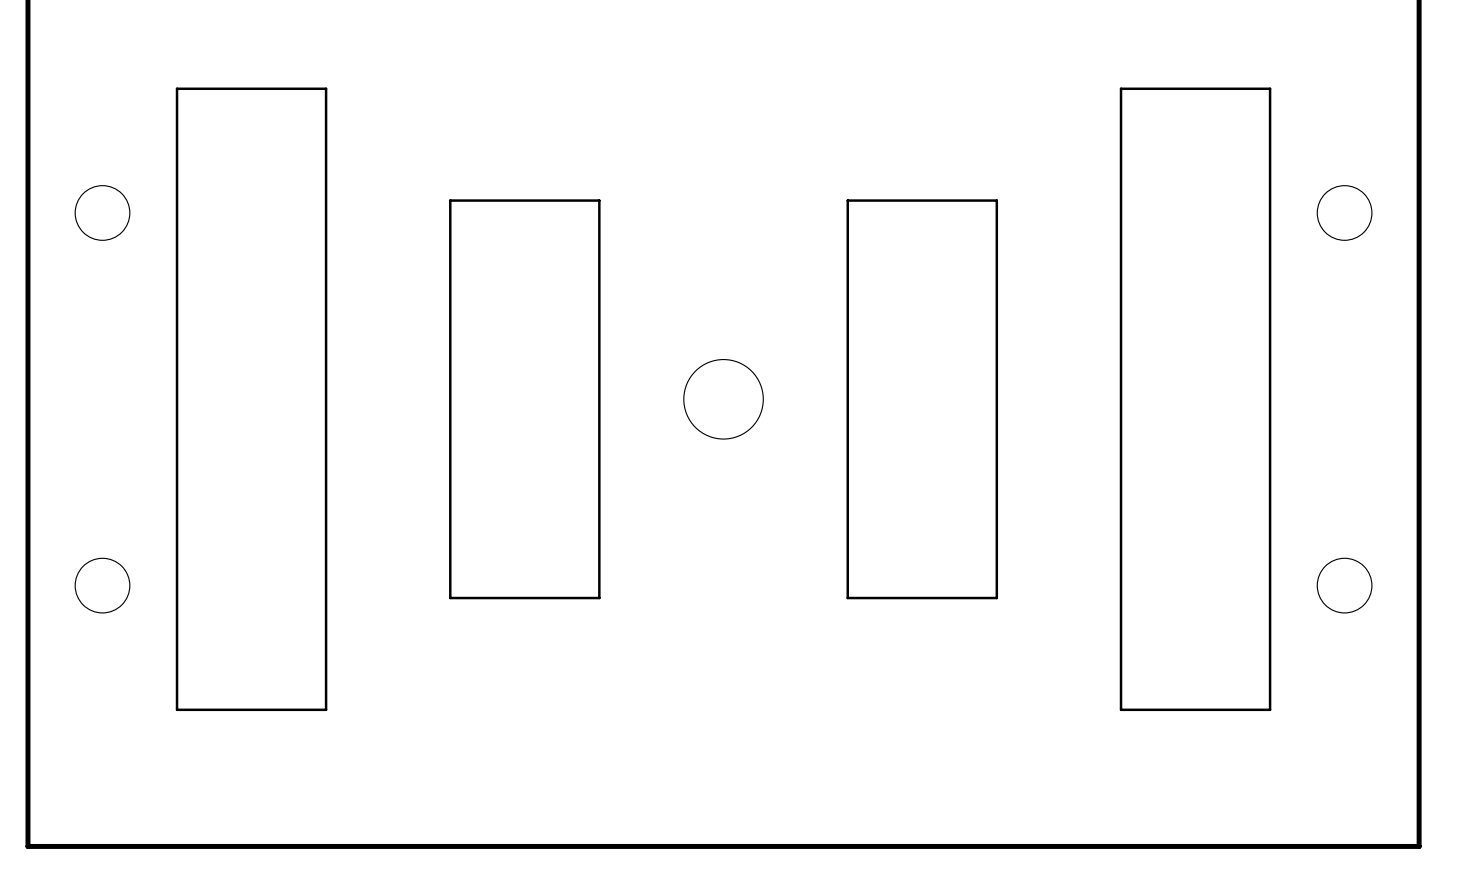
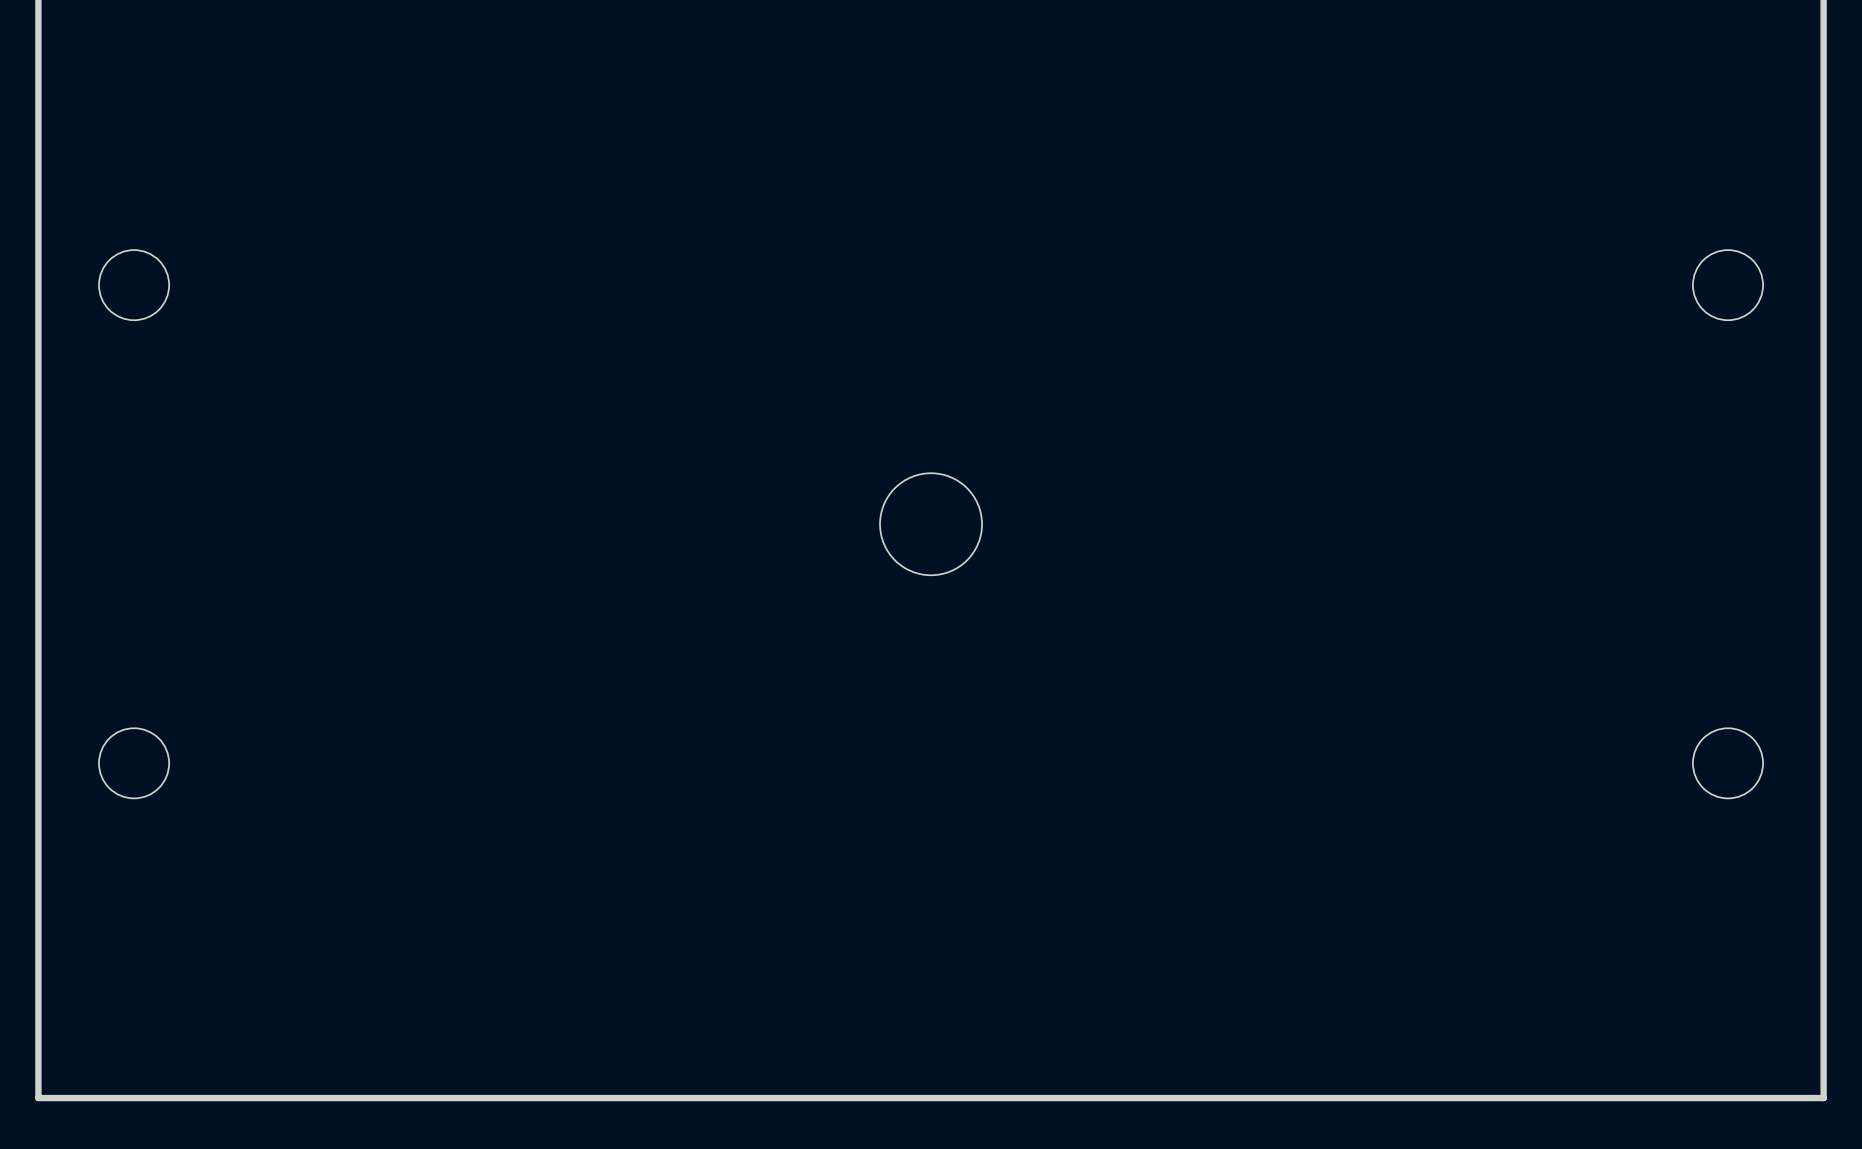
board edge: (177, 88) (326, 88) (326, 709) (177, 709) (177, 88) -> none
board edge: (1121, 88) (1270, 88) (1270, 709) (1121, 709) (1121, 88) -> none
board edge: (450, 200) (599, 200) (599, 598) (450, 598) (450, 200) -> none
board edge: (847, 200) (847, 598) (996, 598) (996, 200) (847, 200) -> none

